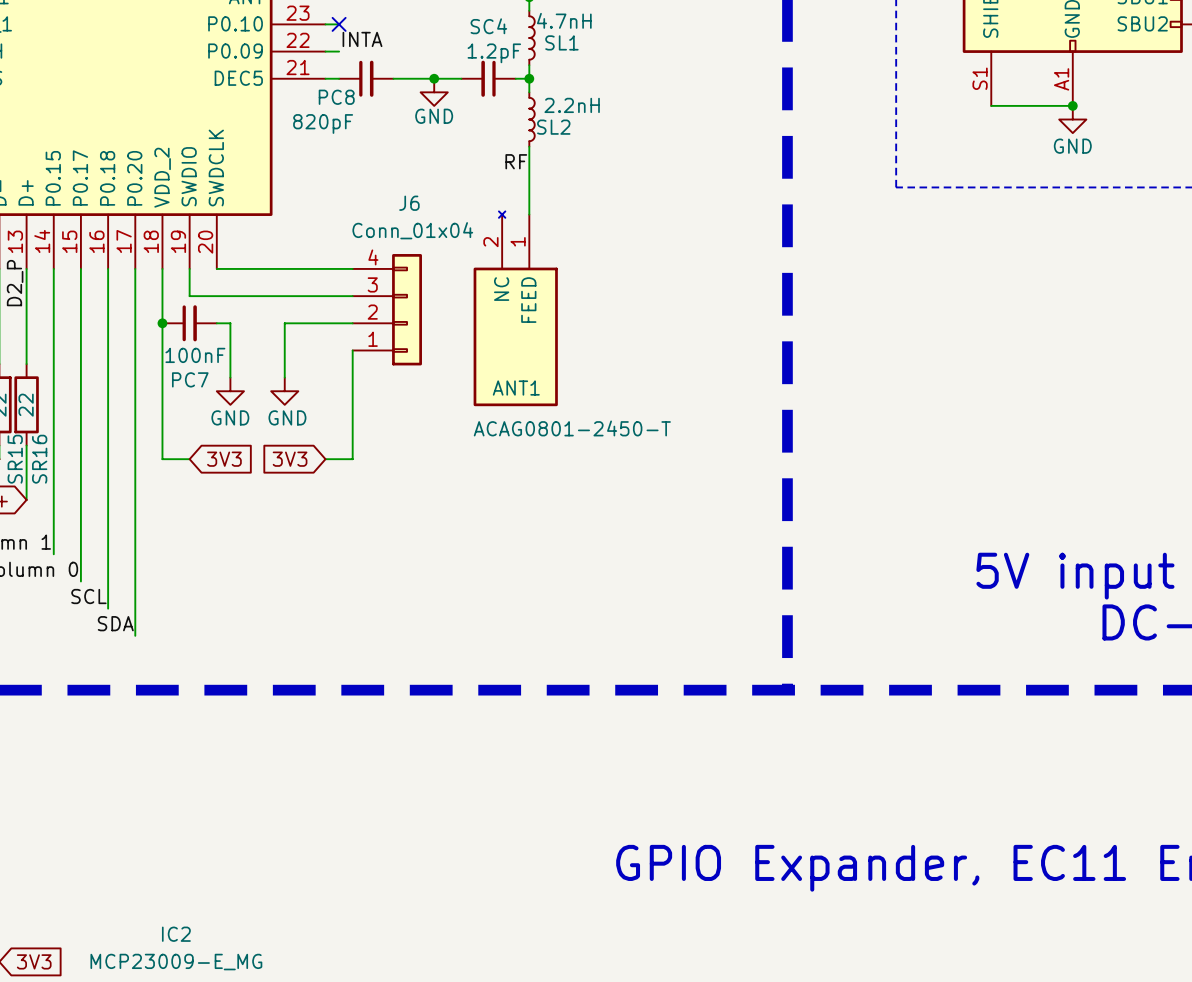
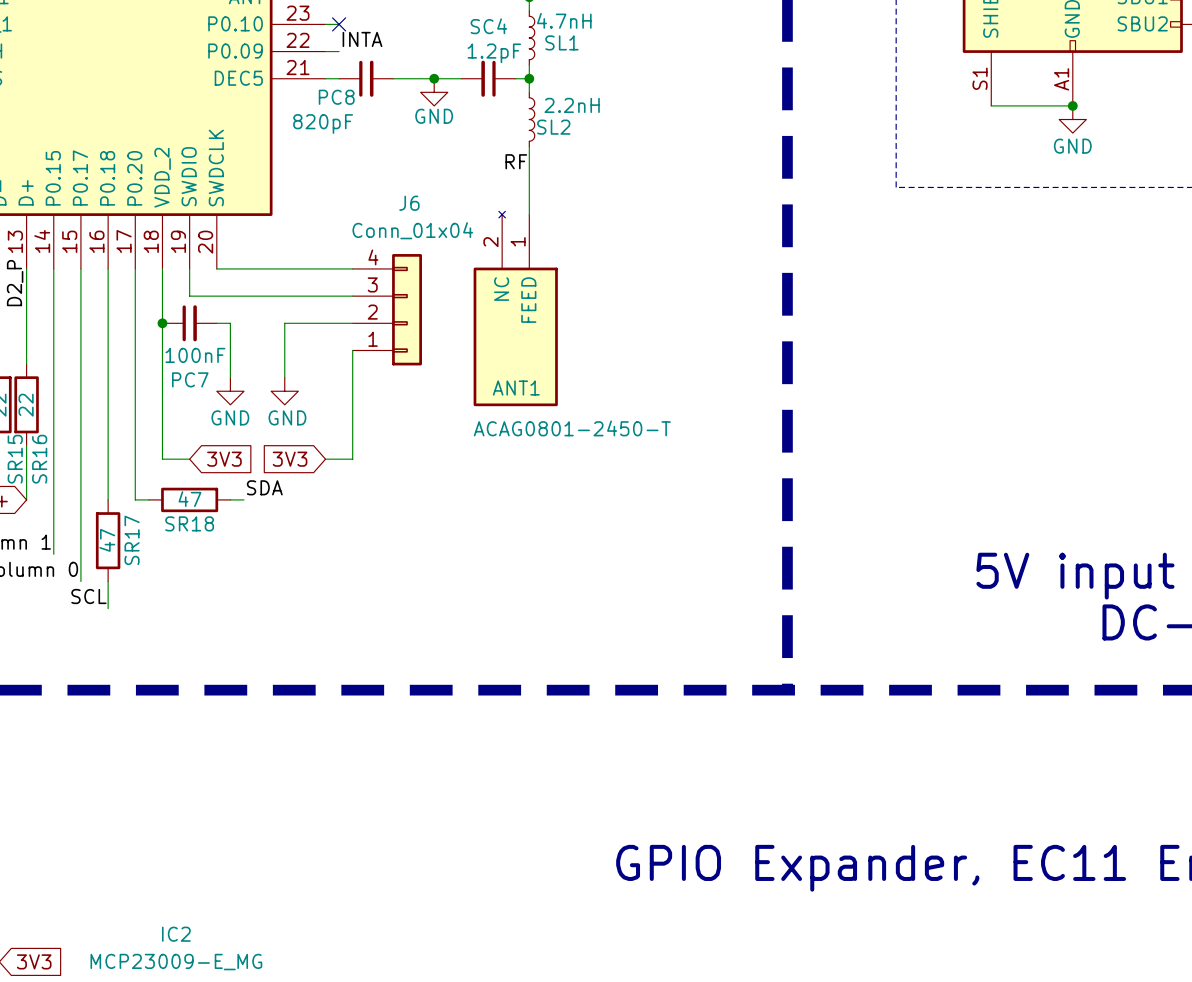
wire: (108, 499) (108, 581) -> none
wire: (135, 499) (135, 635) -> (135, 499) (148, 499)
SR18: none -> 47 (189, 499)
wire: none -> (230, 499) (243, 499)
SR17: none -> 47 (108, 540)
label position: SDA (115, 623) -> SDA (264, 487)

